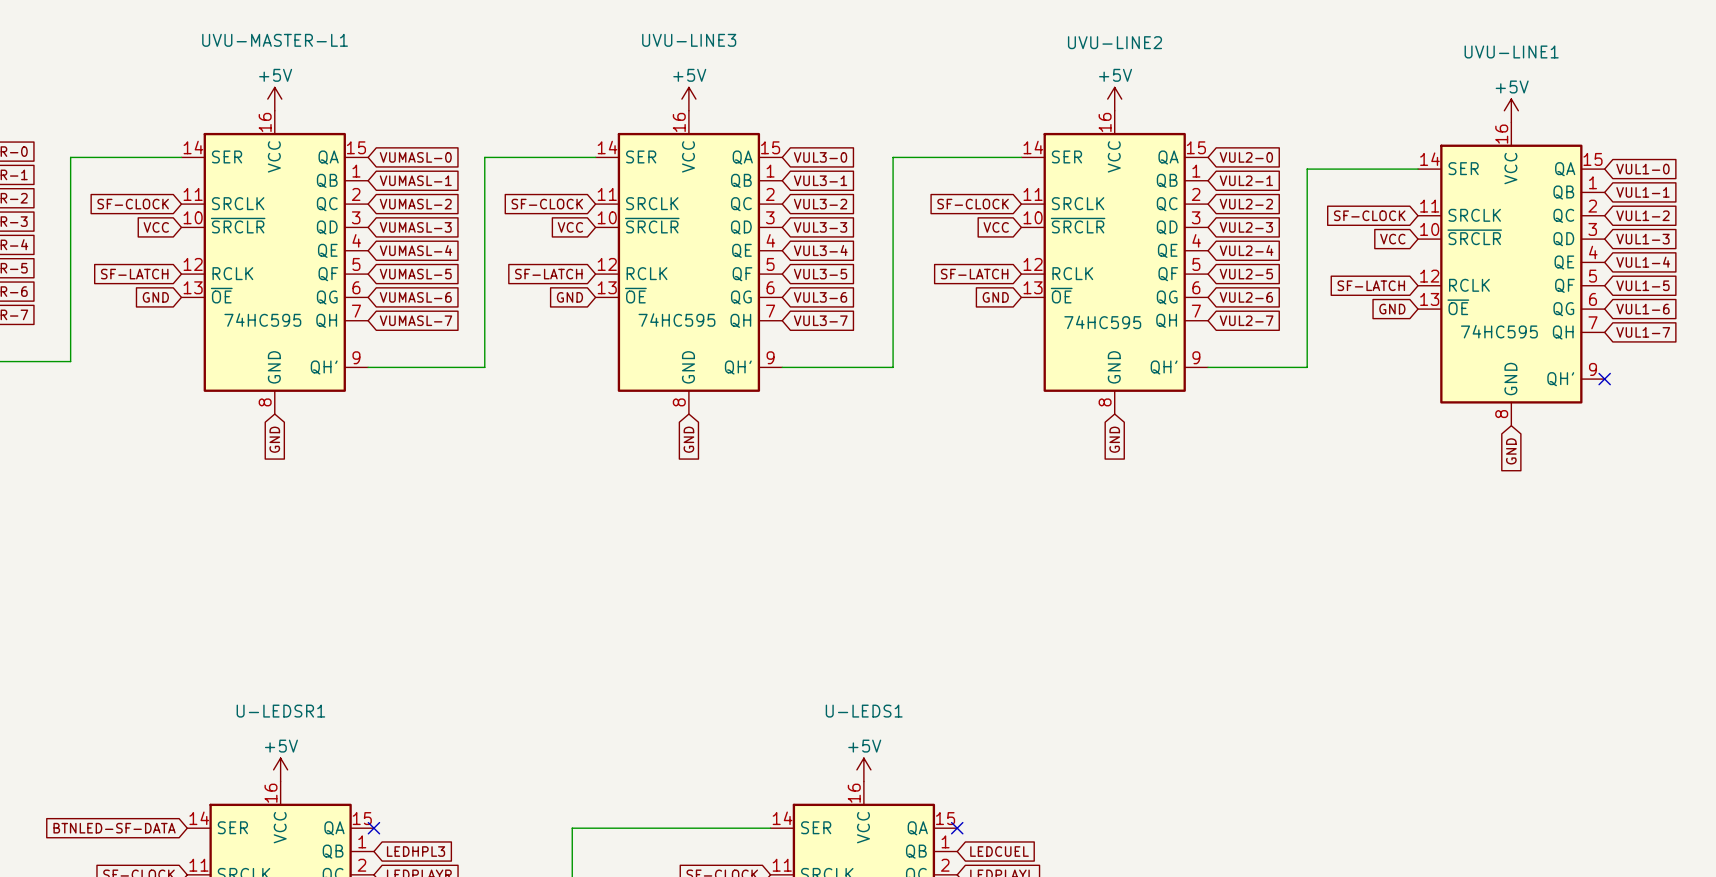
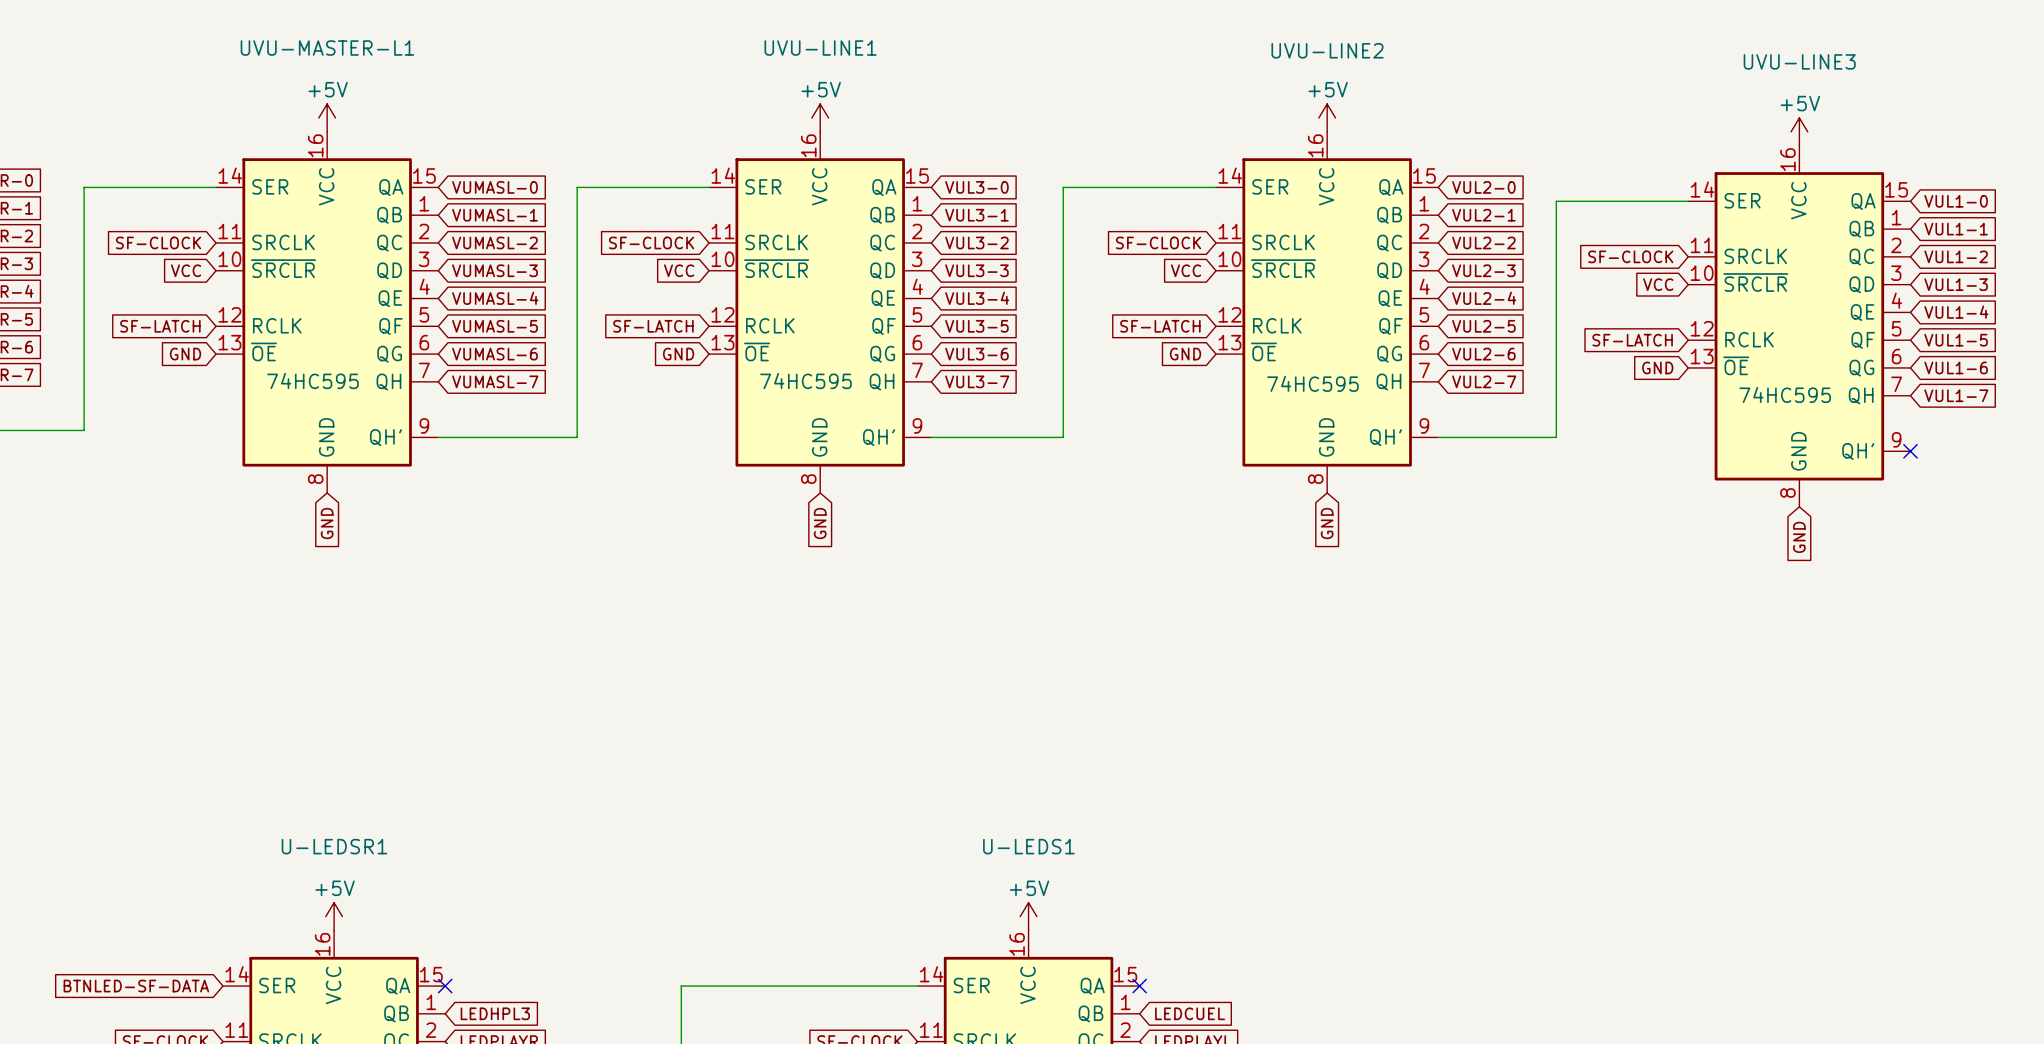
UVU-LINE3 name: UVU-LINE3 (689, 40) -> UVU-LINE1 (820, 48)
UVU-LINE1 name: UVU-LINE1 (1511, 51) -> UVU-LINE3 (1799, 61)

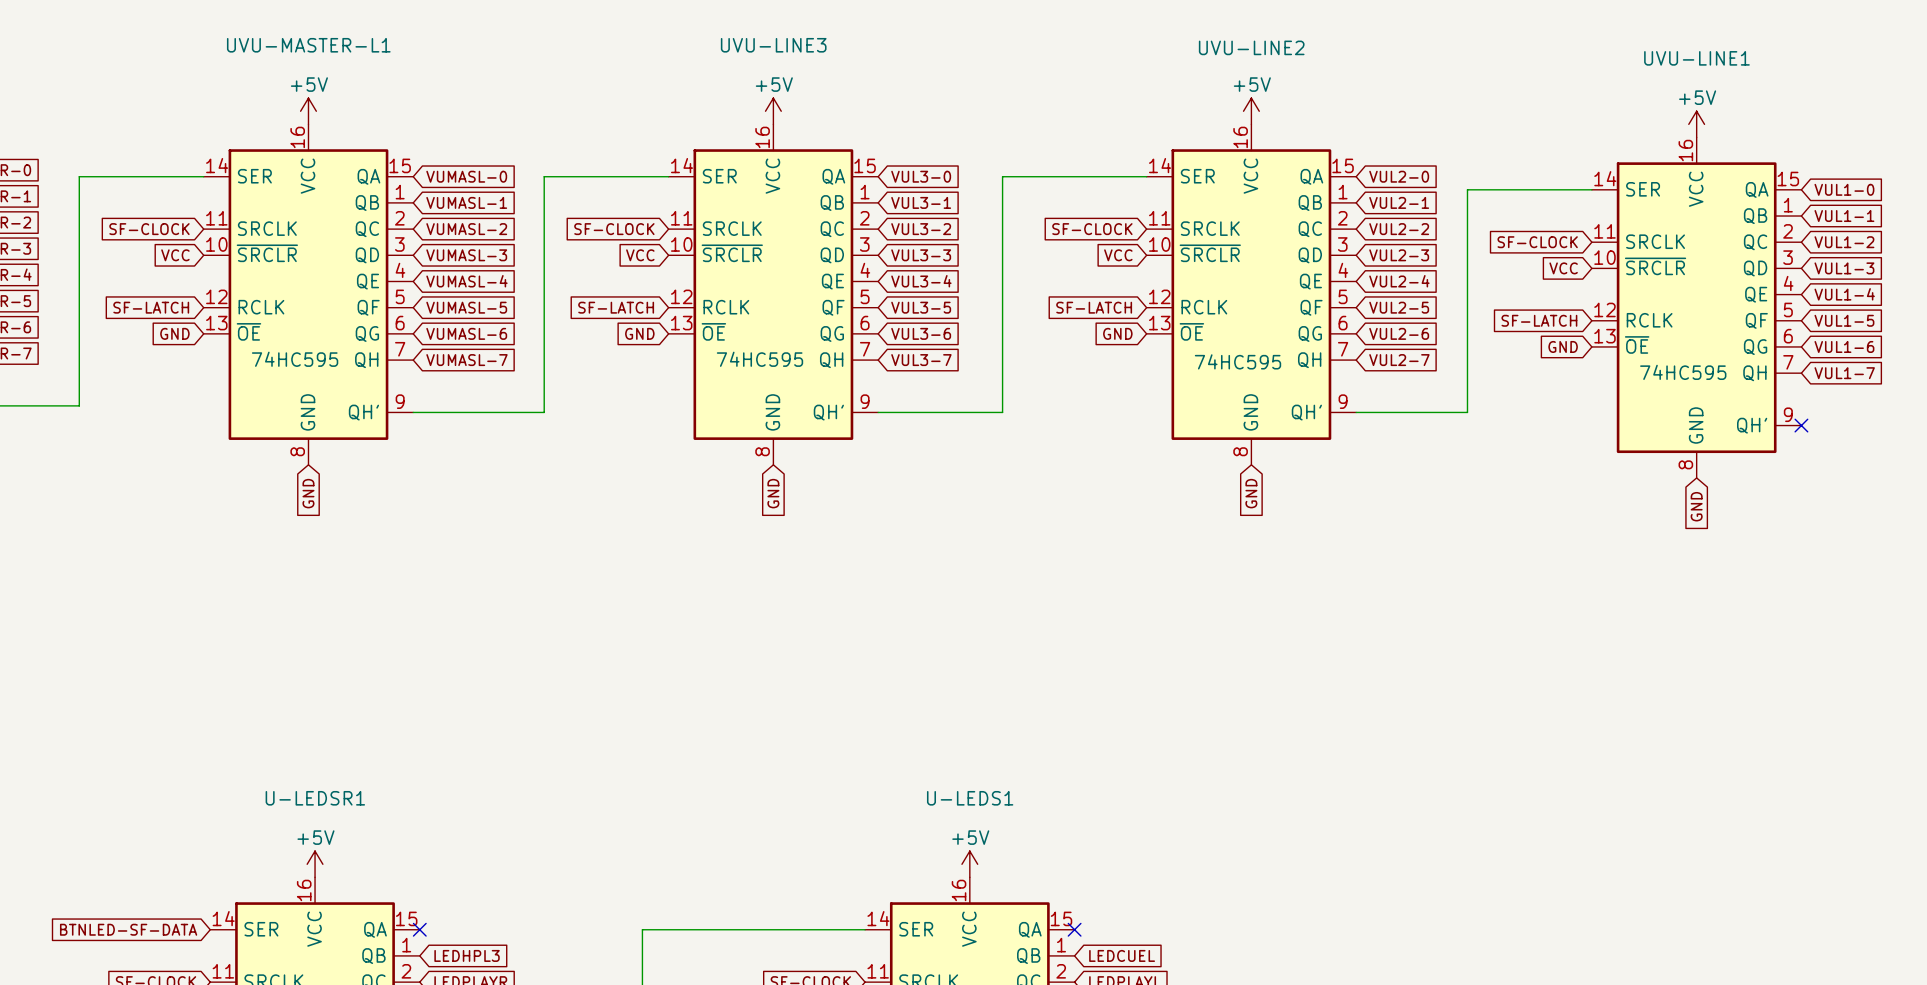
UVU-LINE1 name: UVU-LINE1 (820, 48) -> UVU-LINE3 (773, 45)
UVU-LINE3 name: UVU-LINE3 (1799, 61) -> UVU-LINE1 (1696, 58)

